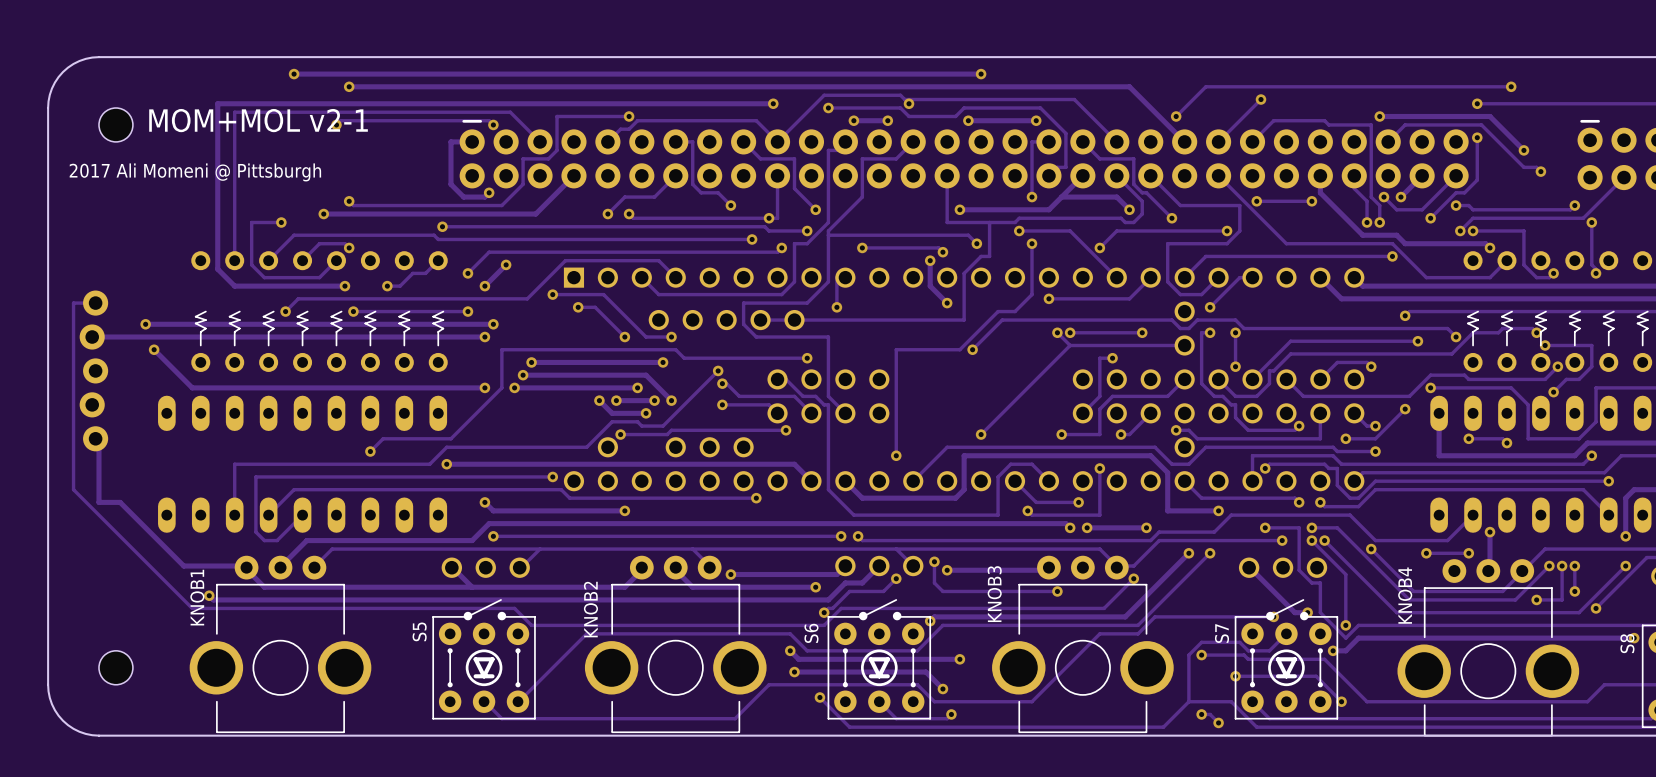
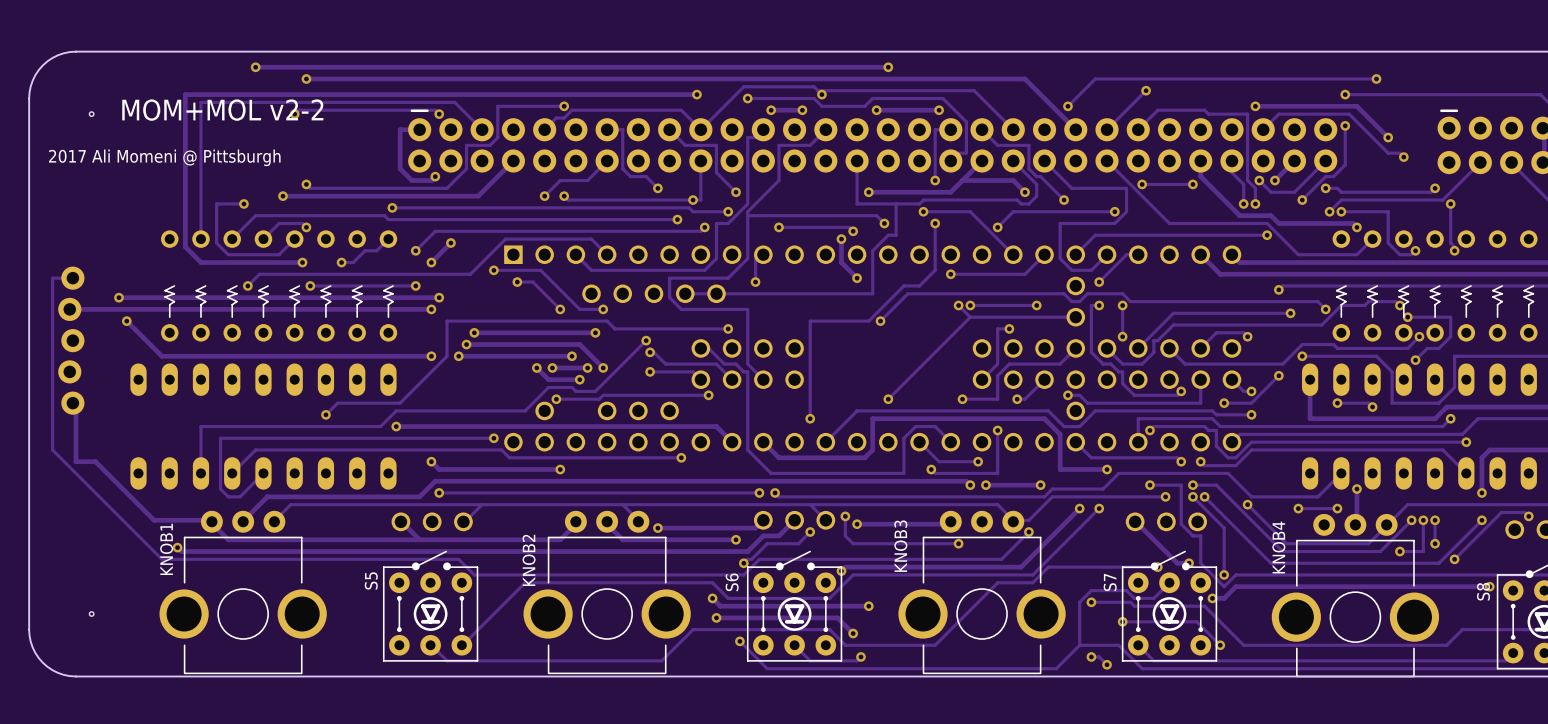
hole size: [98, 108, 133, 142] -> [89, 111, 94, 117]
text: MOM+MOL v2-1 (258, 120) -> MOM+MOL v2-2 (222, 110)
hole size: [98, 650, 133, 685] -> [89, 611, 94, 617]

